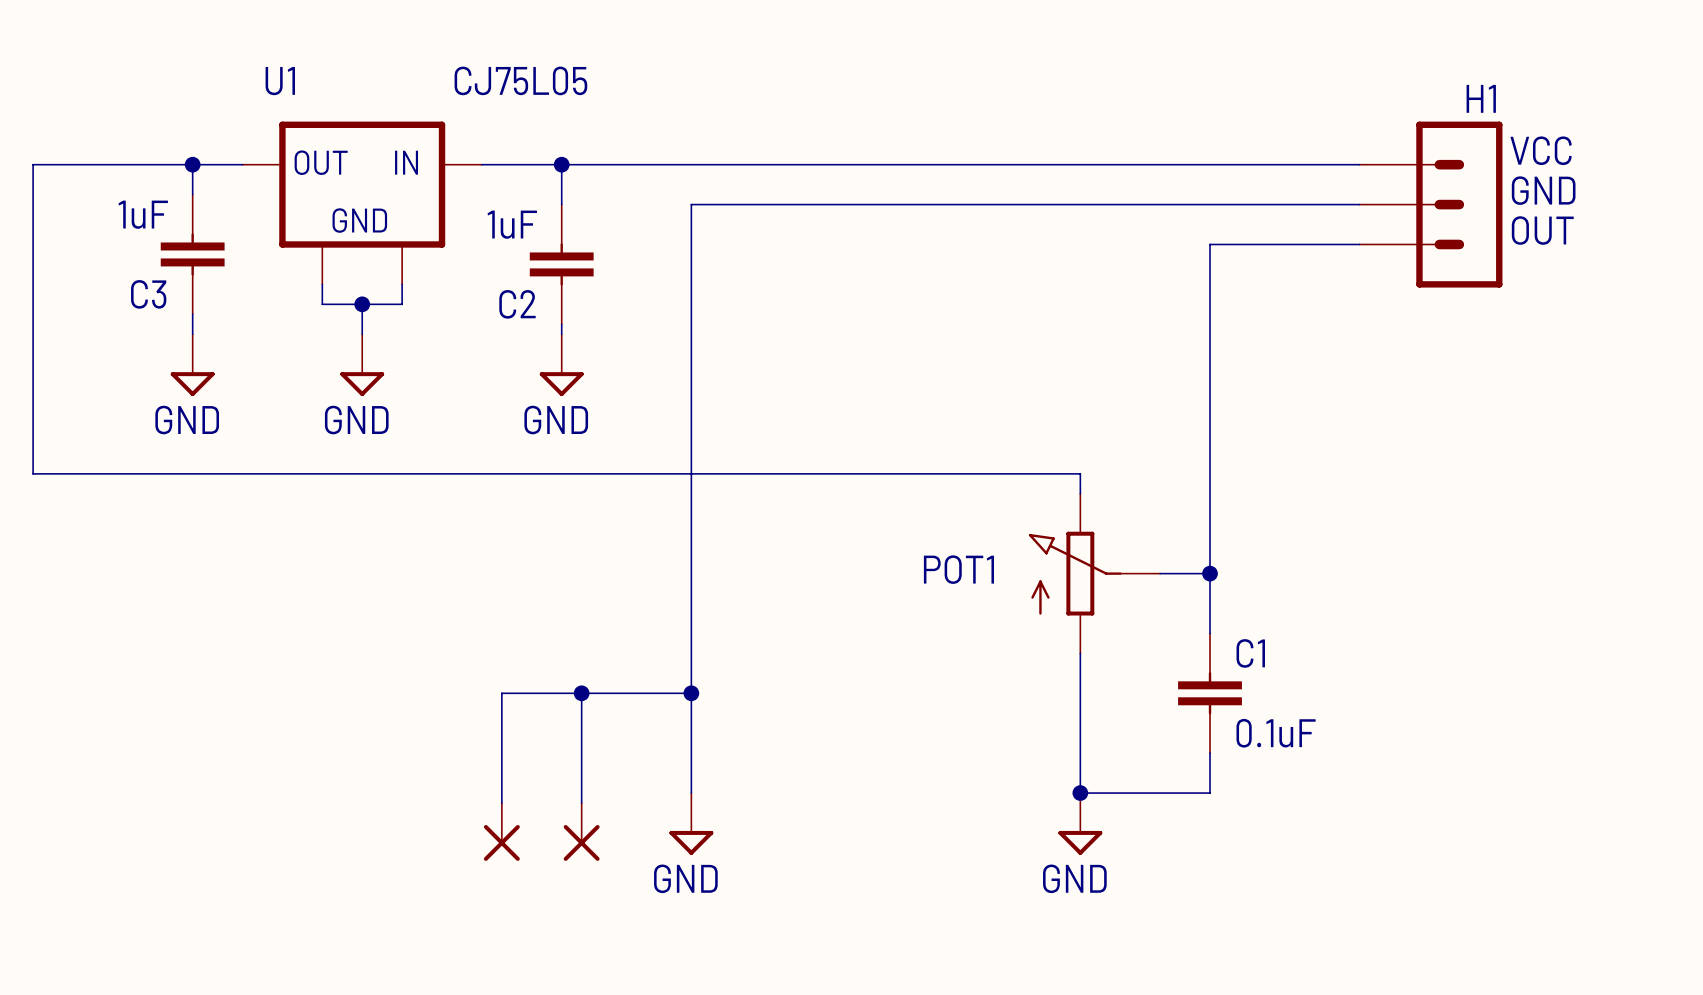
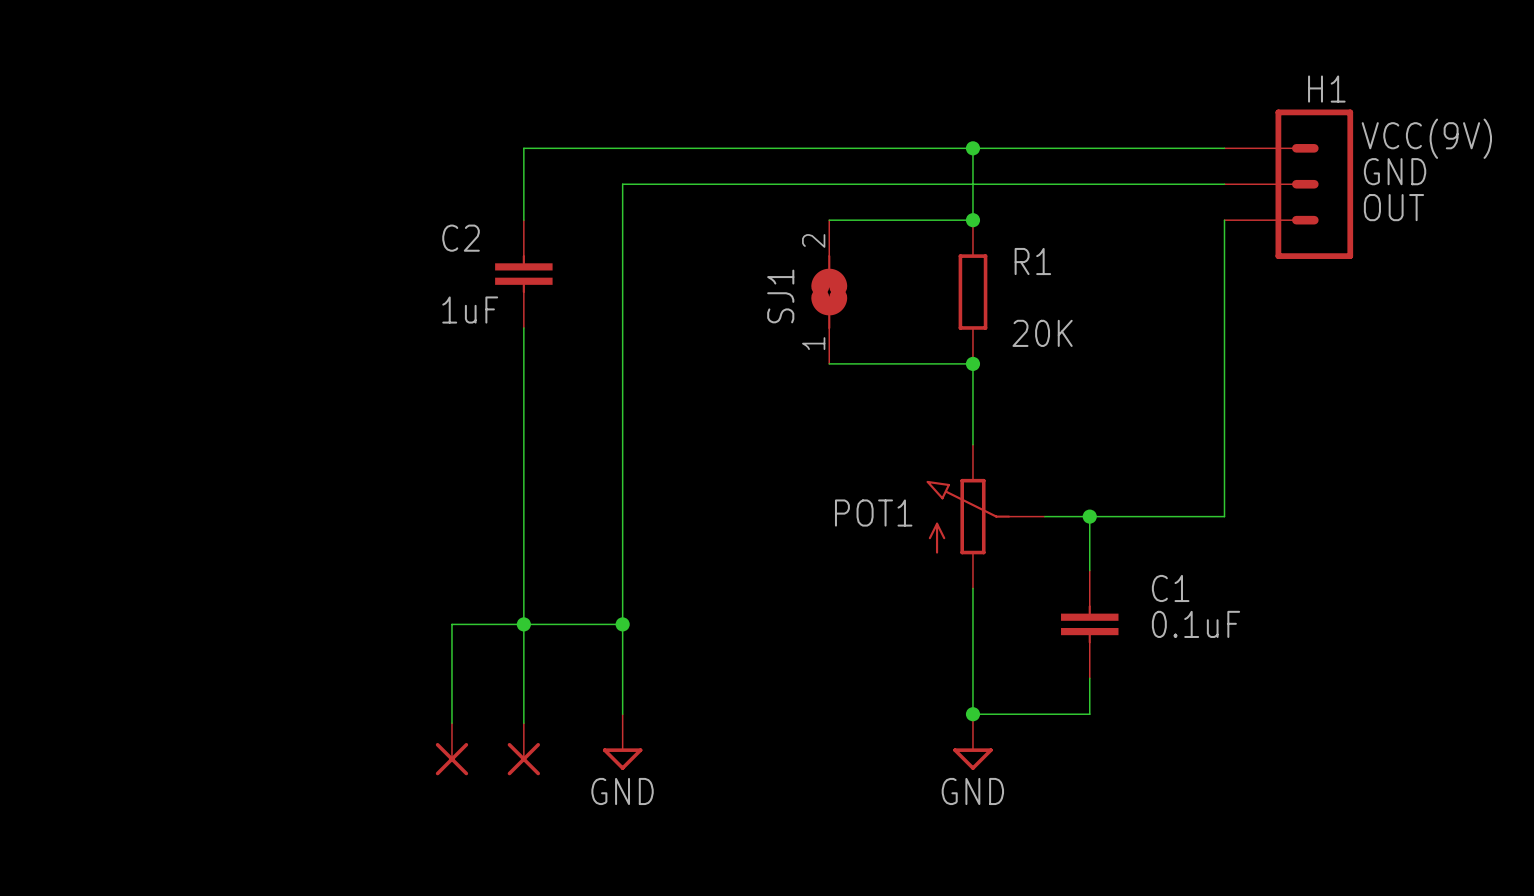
text: CJ75L05 (520, 80) -> none
text: VCC (1541, 150) -> VCC(9V) (1426, 138)
wire: (192, 164) (192, 194) -> none
junction: (192, 164) -> none
wire: (242, 164) (33, 164) (33, 473) (1080, 473) -> (829, 363) (972, 363) (972, 426)
wire: (481, 164) (581, 164) -> (523, 220) (523, 148)
wire: (561, 164) (561, 204) -> none
junction: (561, 164) -> none
wire: none -> (972, 148) (972, 220) (829, 220)
junction: none -> (972, 148)
U1: (362, 202) -> none
C2 value position: 1uF (512, 224) -> 1uF (470, 310)
junction: none -> (972, 220)
wire: (1359, 244) (1210, 244) (1210, 573) -> (1224, 220) (1224, 516) (1089, 516)
C3: 1uF (192, 254) -> none
C2 position: (561, 264) -> (523, 274)
wire: (322, 284) (322, 304) (402, 304) (402, 284) -> none
wire: (362, 304) (362, 334) -> none
junction: (362, 304) -> none
C2 name position: C2 (517, 304) -> C2 (461, 238)
wire: (192, 314) (192, 334) -> none
wire: (561, 324) (561, 334) -> none
SJ1: none -> (829, 292)
R1: none -> 20K (972, 292)
wire: none -> (523, 327) (523, 624)
power symbol: GND (192, 365) -> none
power symbol: GND (362, 365) -> none
power symbol: GND (561, 365) -> none
junction: none -> (972, 363)
C1 name position: C1 (1250, 653) -> C1 (1170, 588)
C1 value position: 0.1uF (1276, 733) -> 0.1uF (1195, 624)

